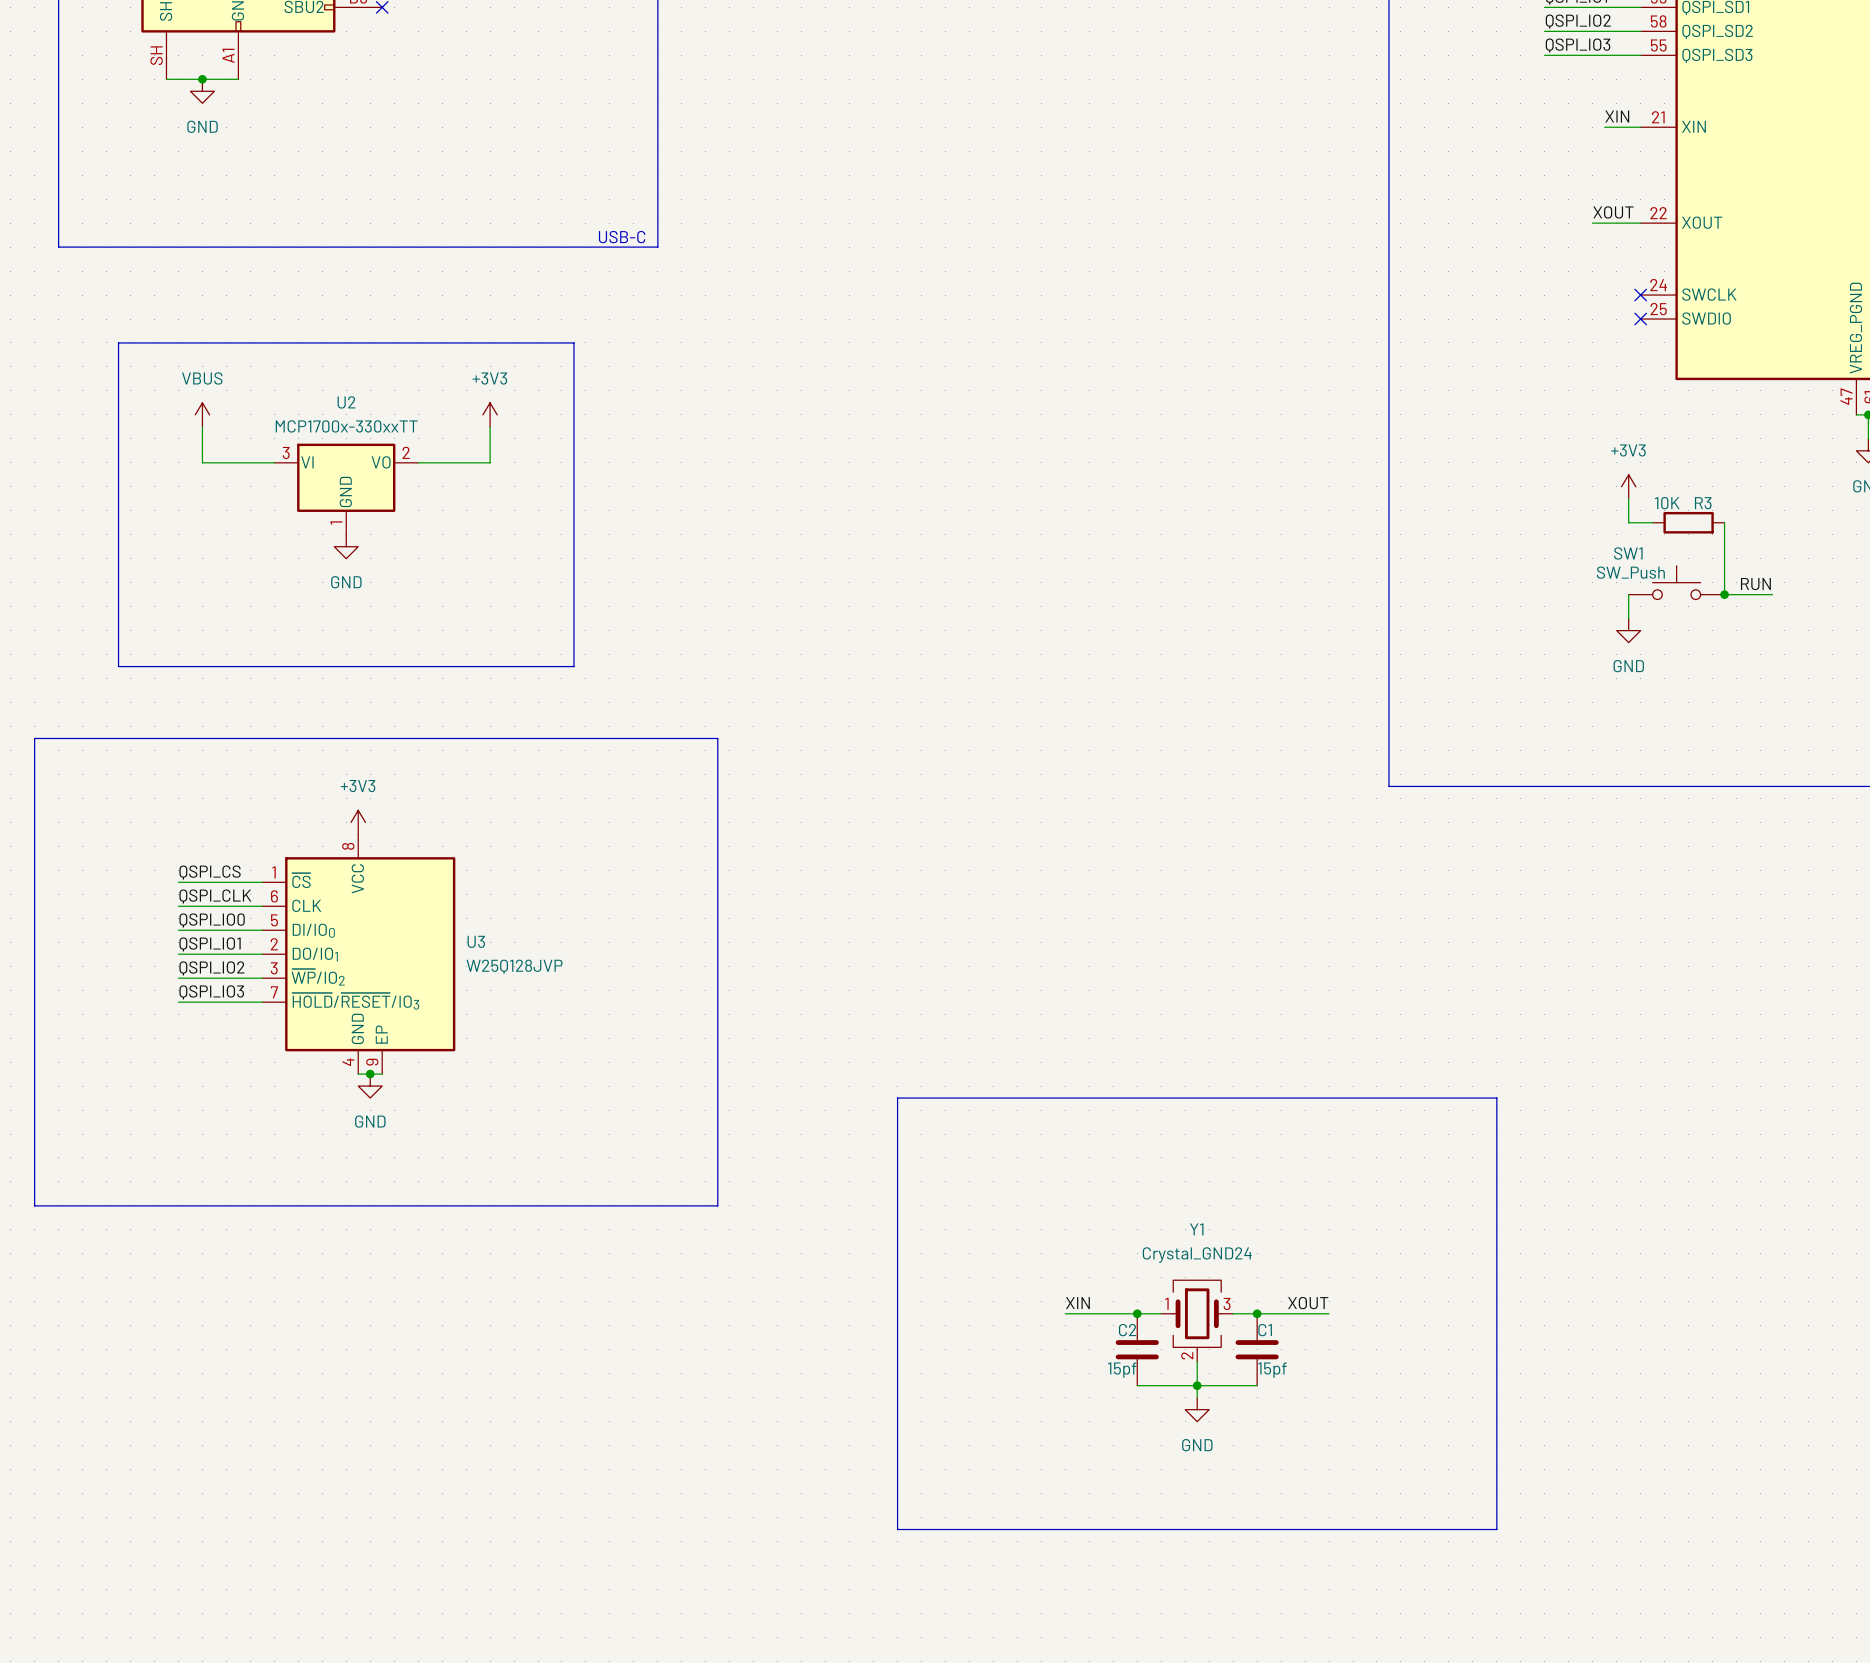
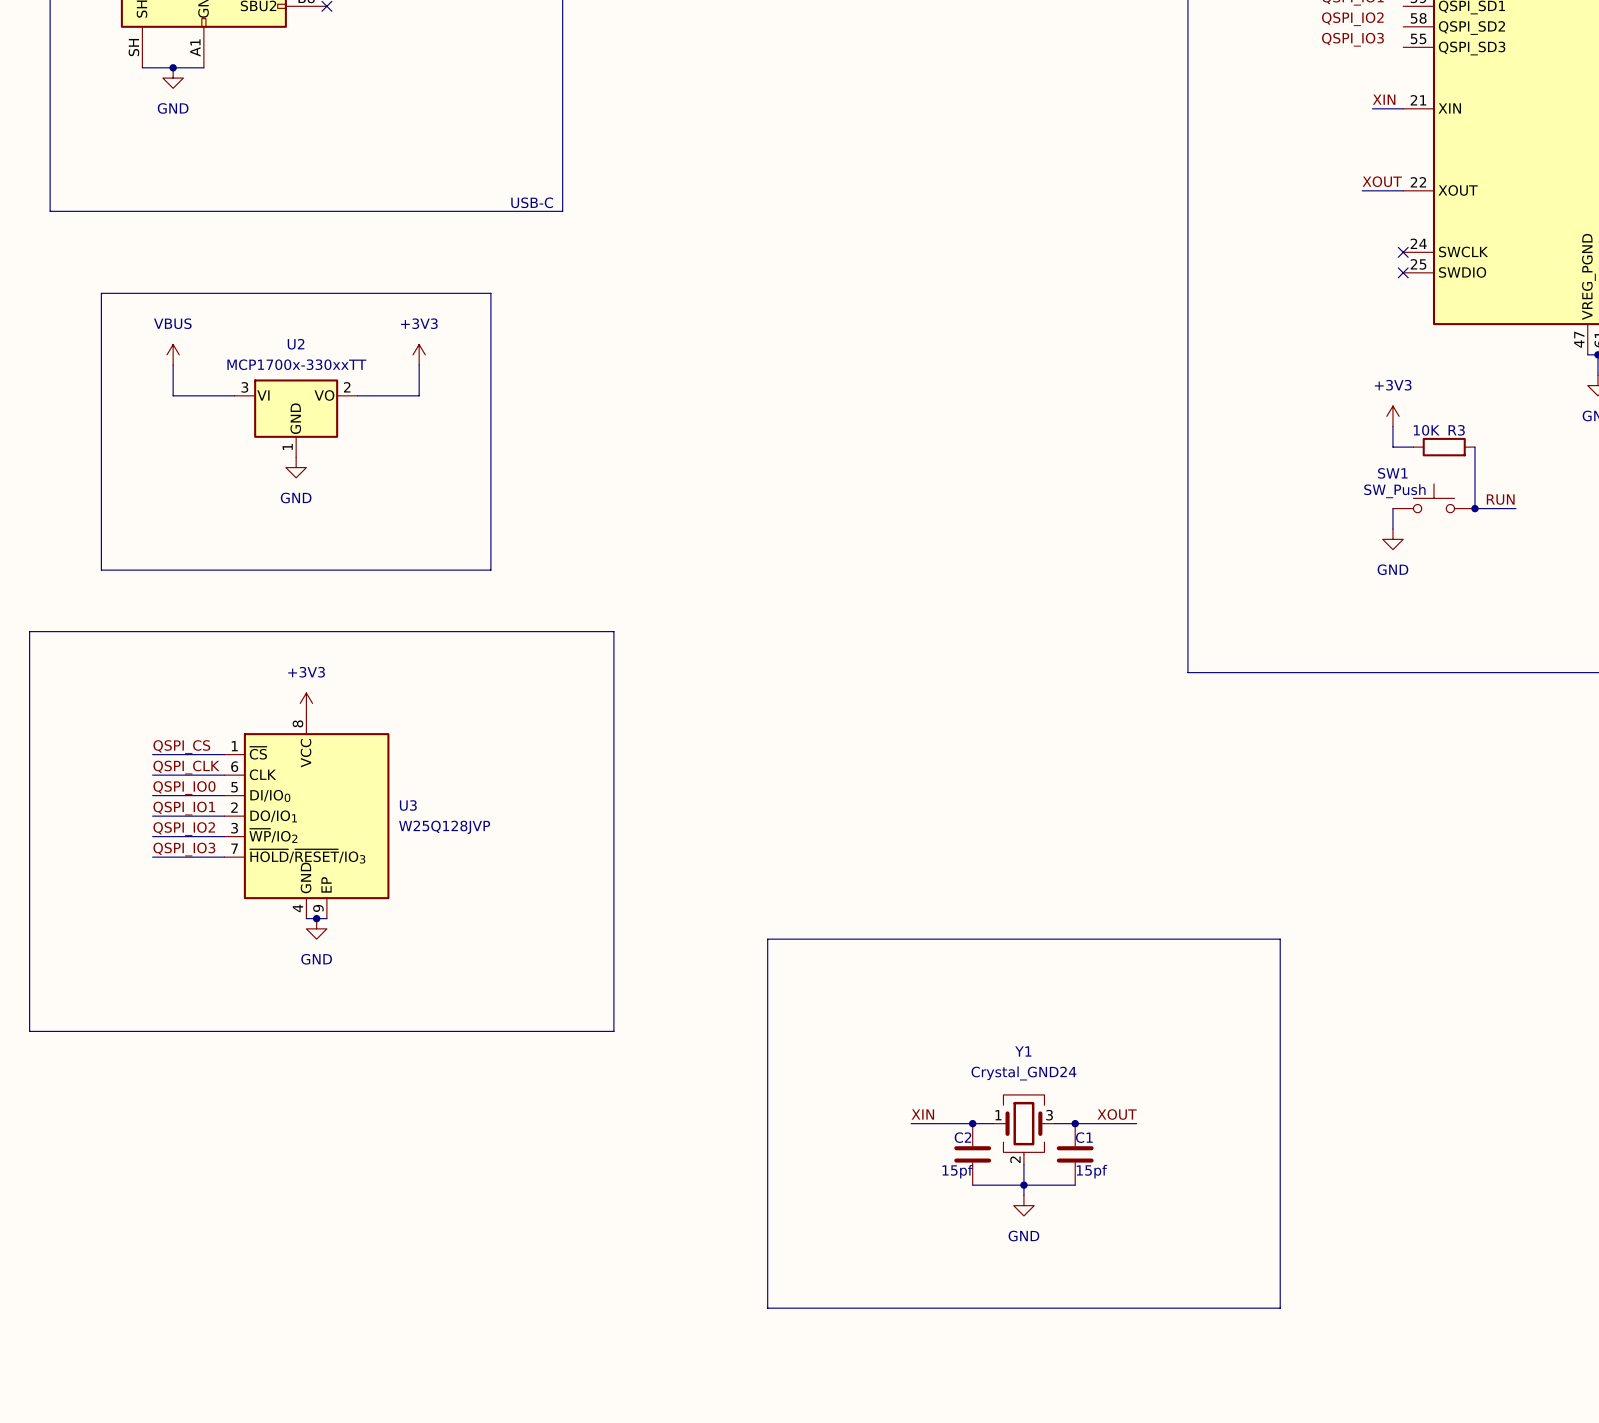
wire: (1544, 7) (1640, 7) -> none
wire: (1544, 31) (1640, 31) -> none
wire: (1544, 55) (1640, 55) -> none

